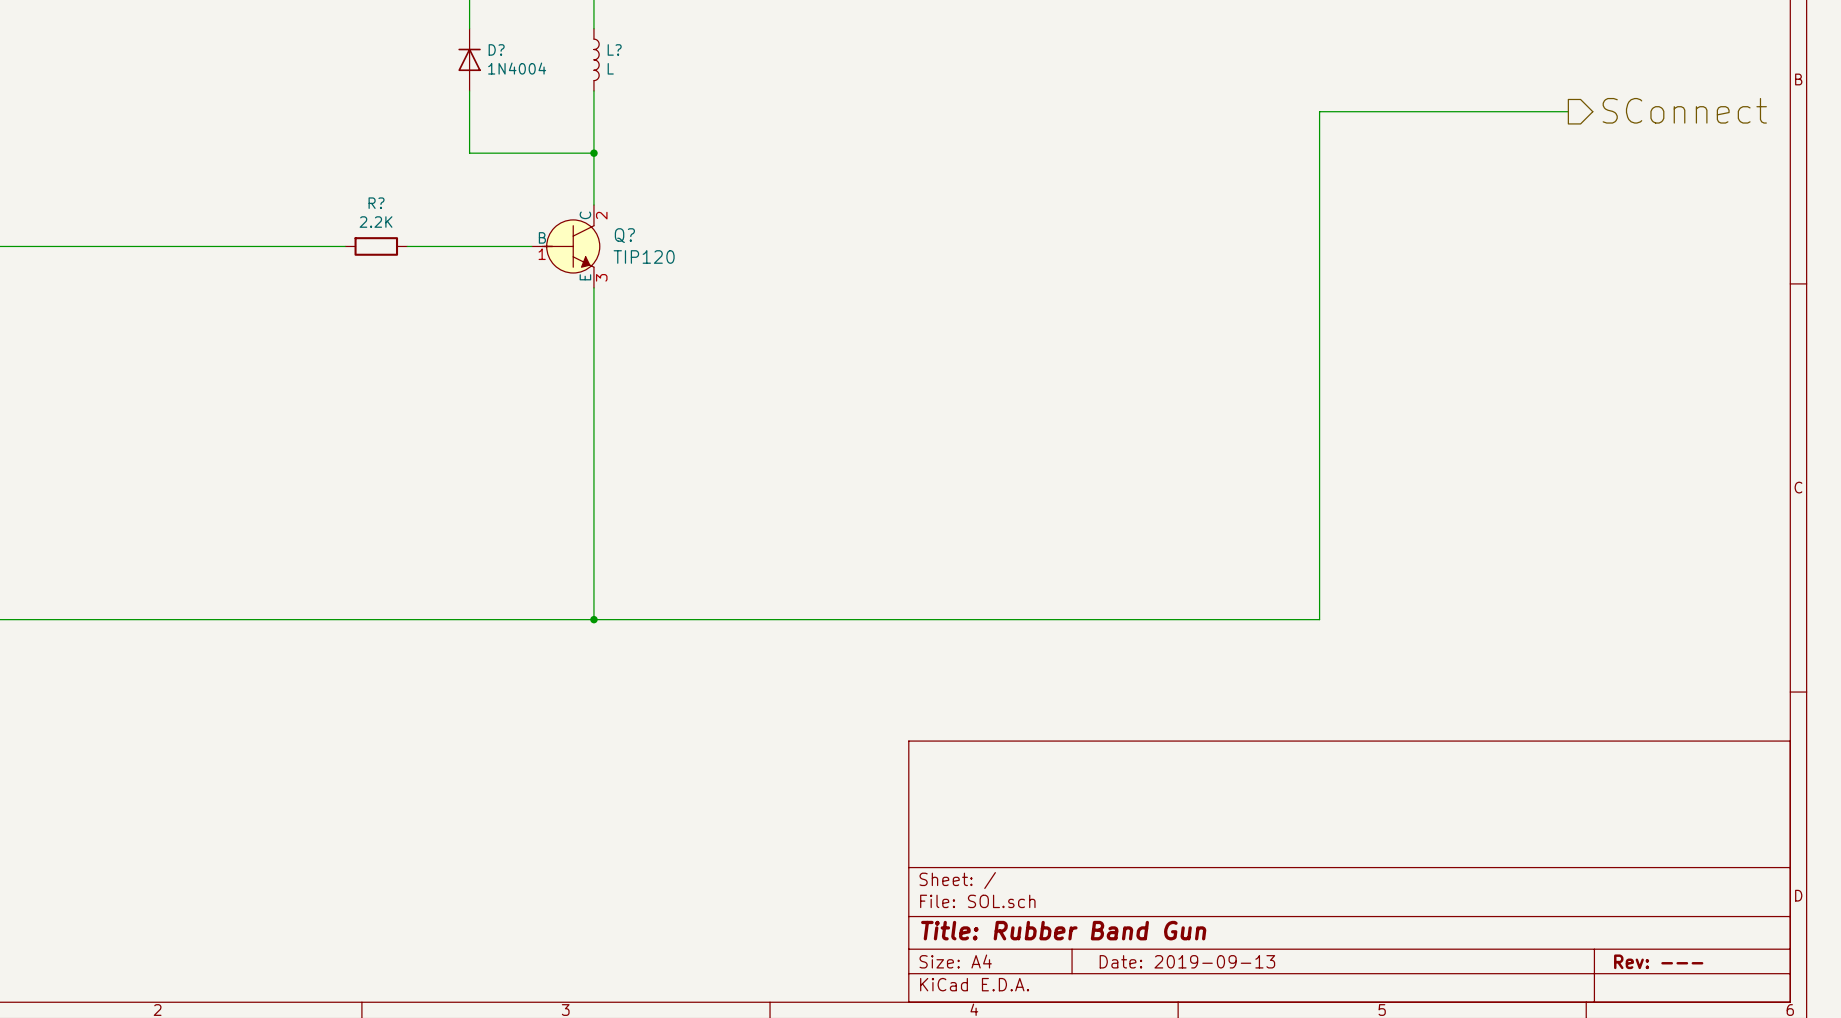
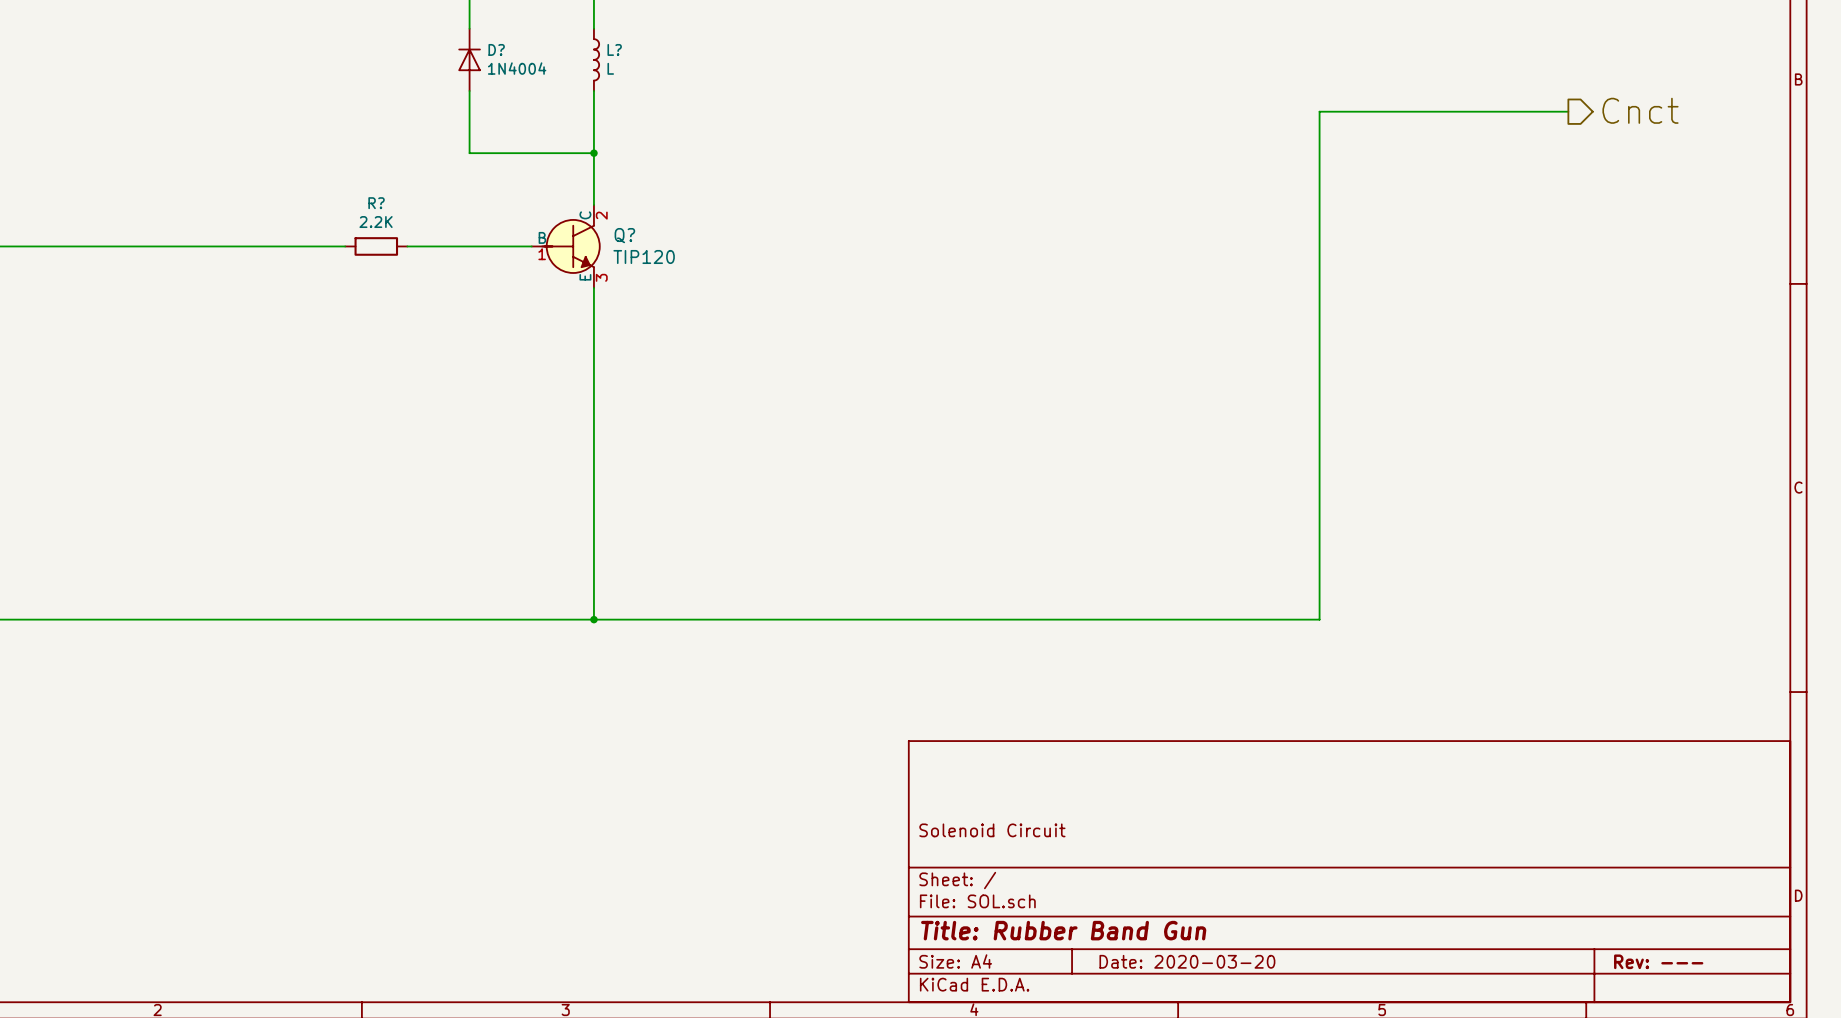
hierarchical label: SConnect (1684, 110) -> Cnct (1640, 110)
title block: none -> Solenoid Circuit (992, 830)
title block: Date: 2019-09-13 (1187, 961) -> Date: 2020-03-20 (1187, 961)

